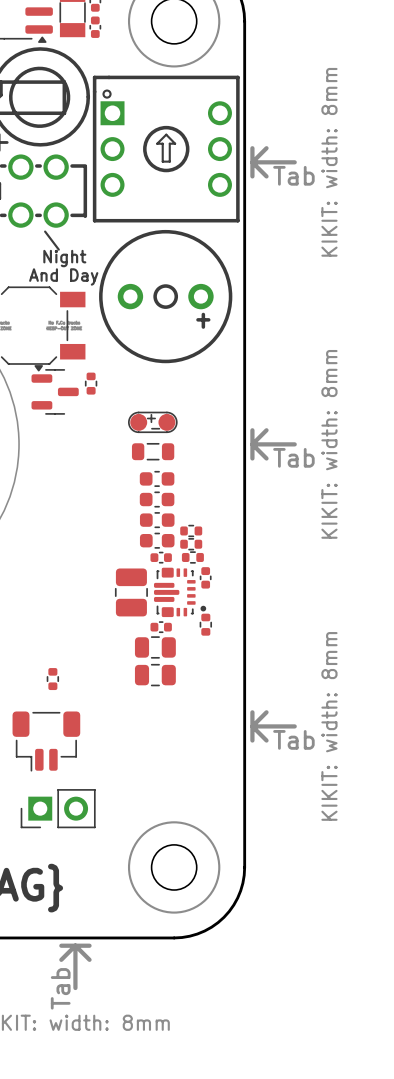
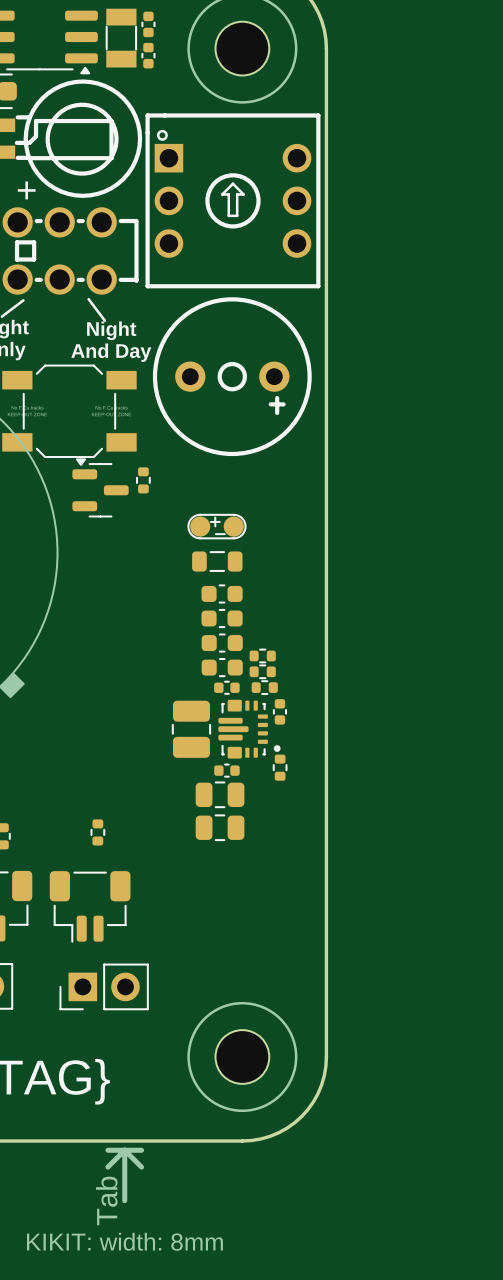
drawing: [250, 146, 297, 179] -> none
drawing: [250, 428, 297, 461] -> none
drawing: [250, 710, 297, 743] -> none

